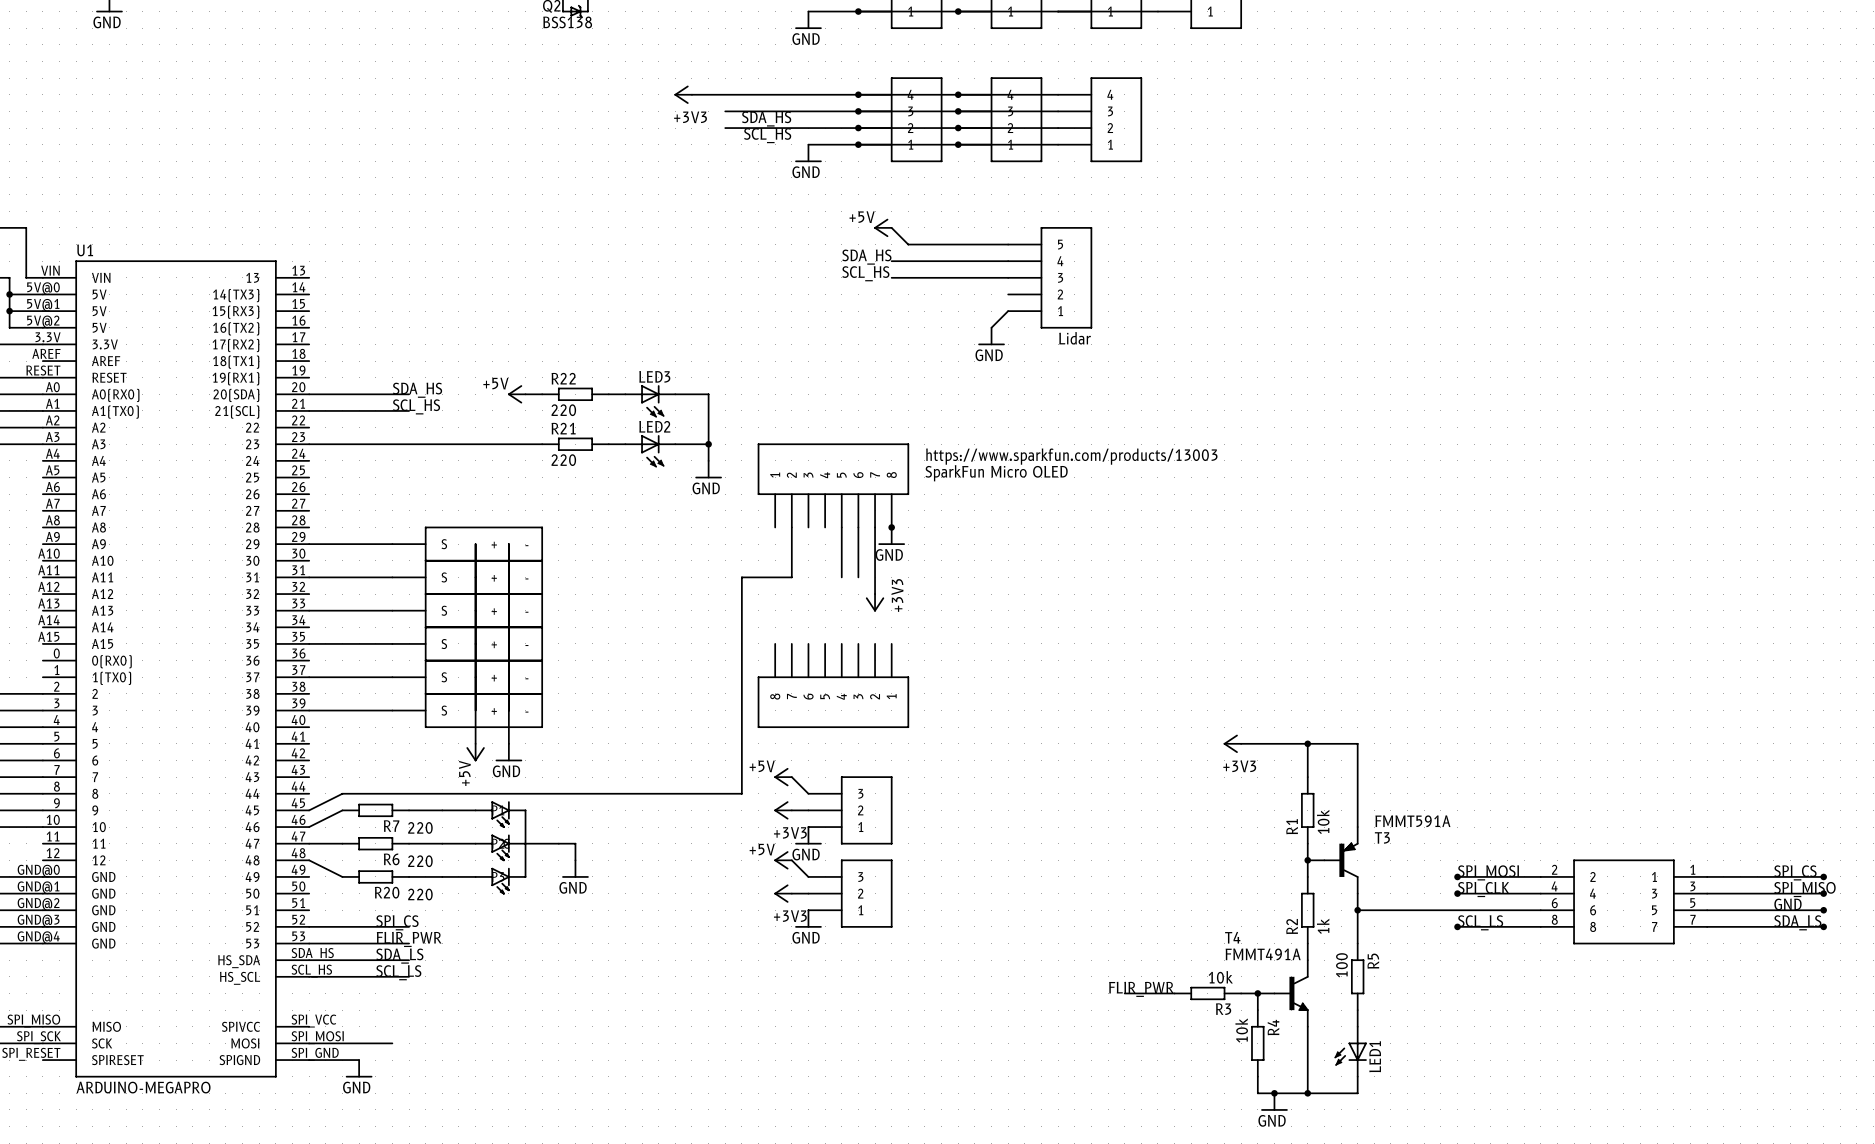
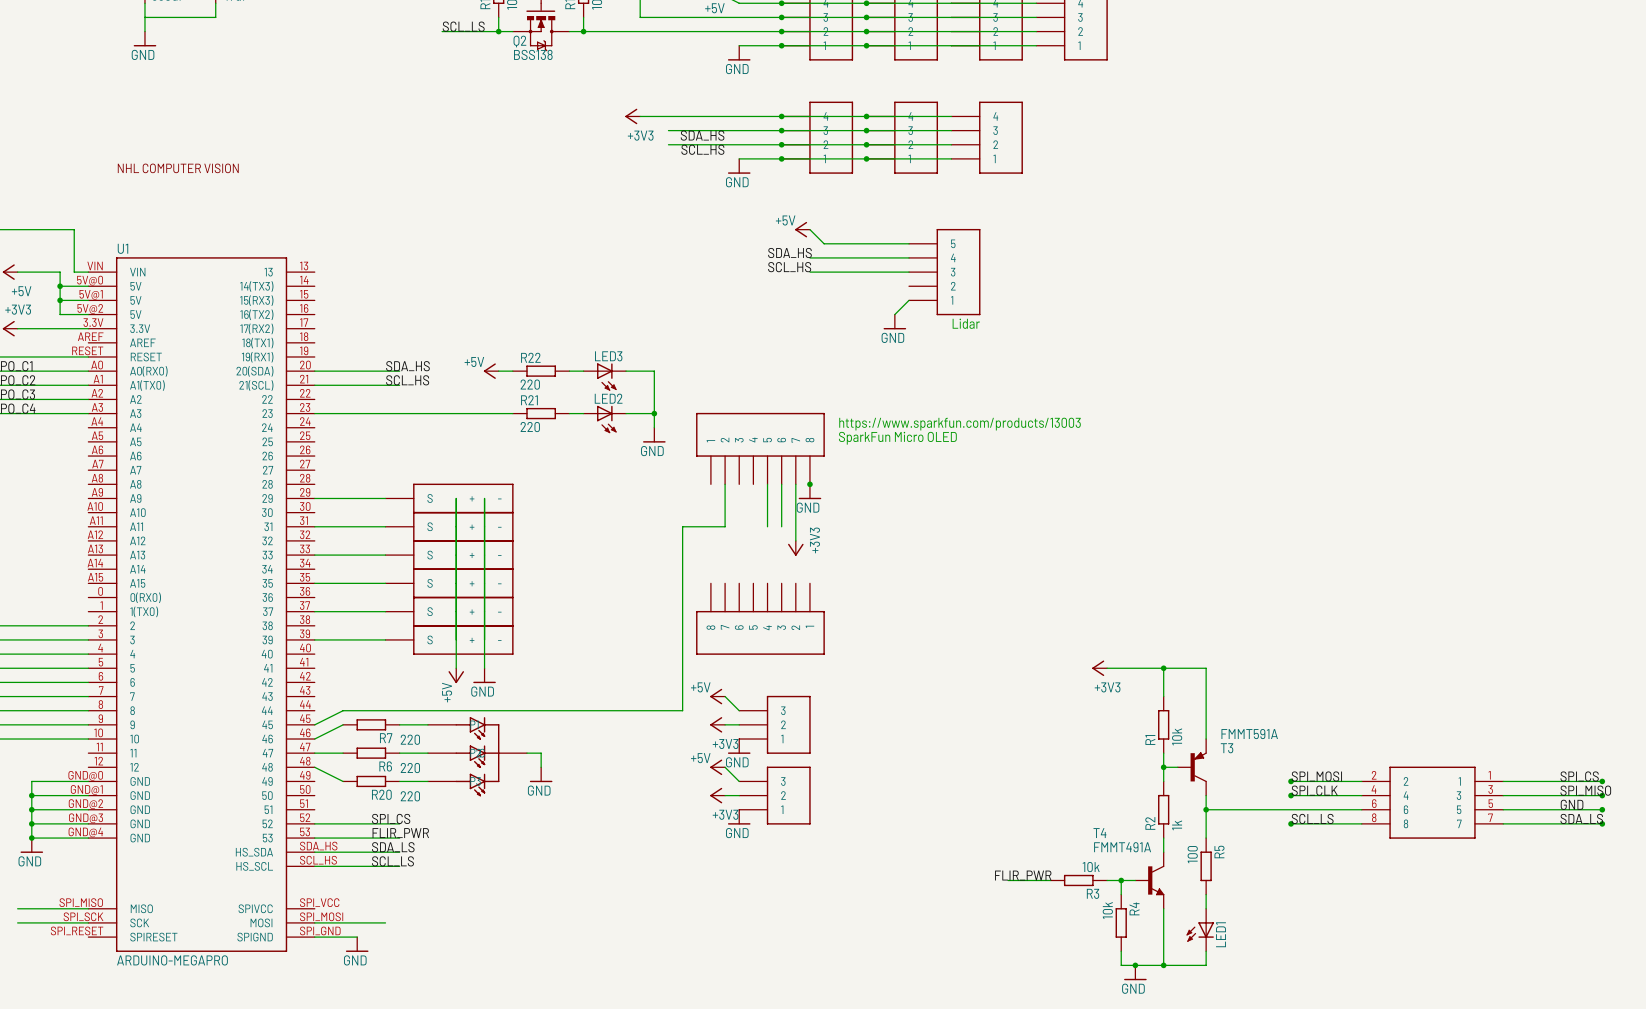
part: none -> (178, 168)

